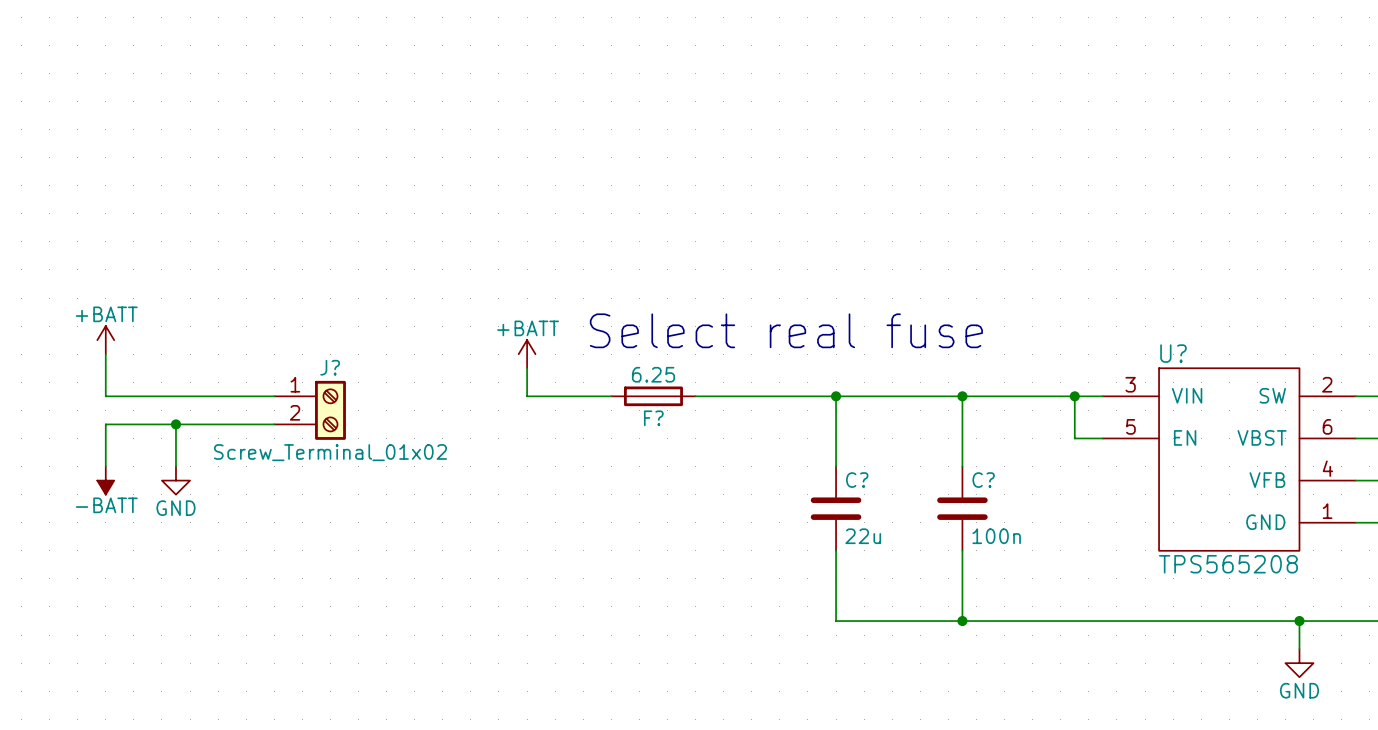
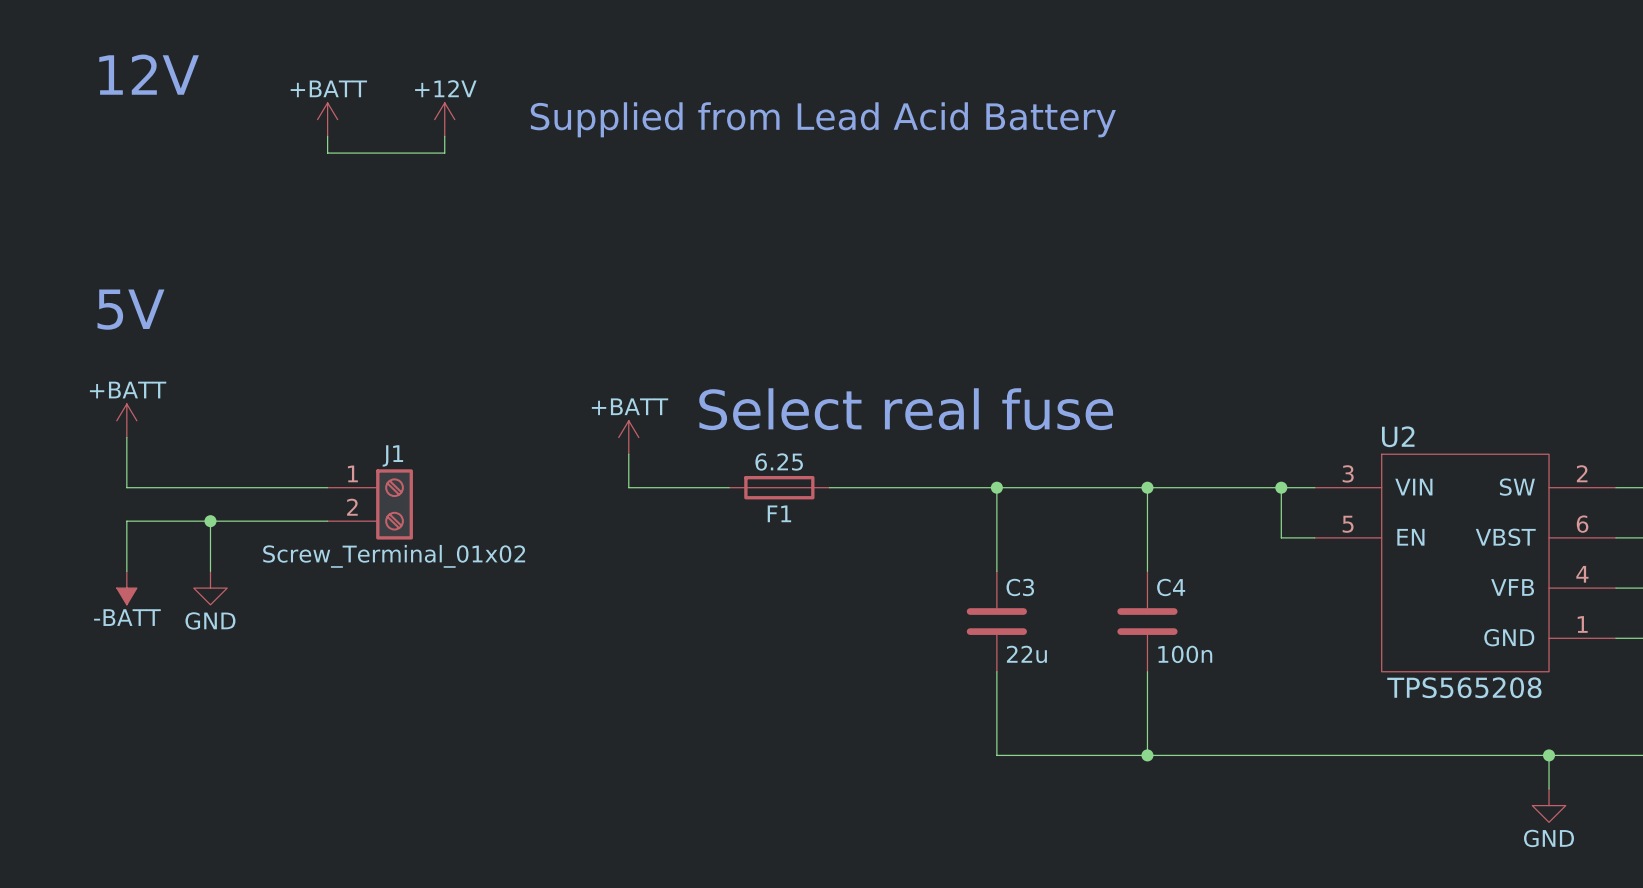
text: none -> 12V (149, 74)
power symbol: none -> +BATT (327, 119)
power symbol: none -> +12V (444, 119)
text: none -> Supplied from Lead Acid Battery (823, 119)
wire: none -> (327, 136) (327, 153) (444, 153) (444, 136)
text: none -> 5V (130, 309)
U? name: U? (1173, 353) -> U2 (1398, 436)
J? name: J? (330, 367) -> J1 (392, 455)
F? name: F? (653, 418) -> F1 (779, 513)
C? name: C? (857, 480) -> C3 (1020, 587)
C? name: C? (983, 480) -> C4 (1171, 587)

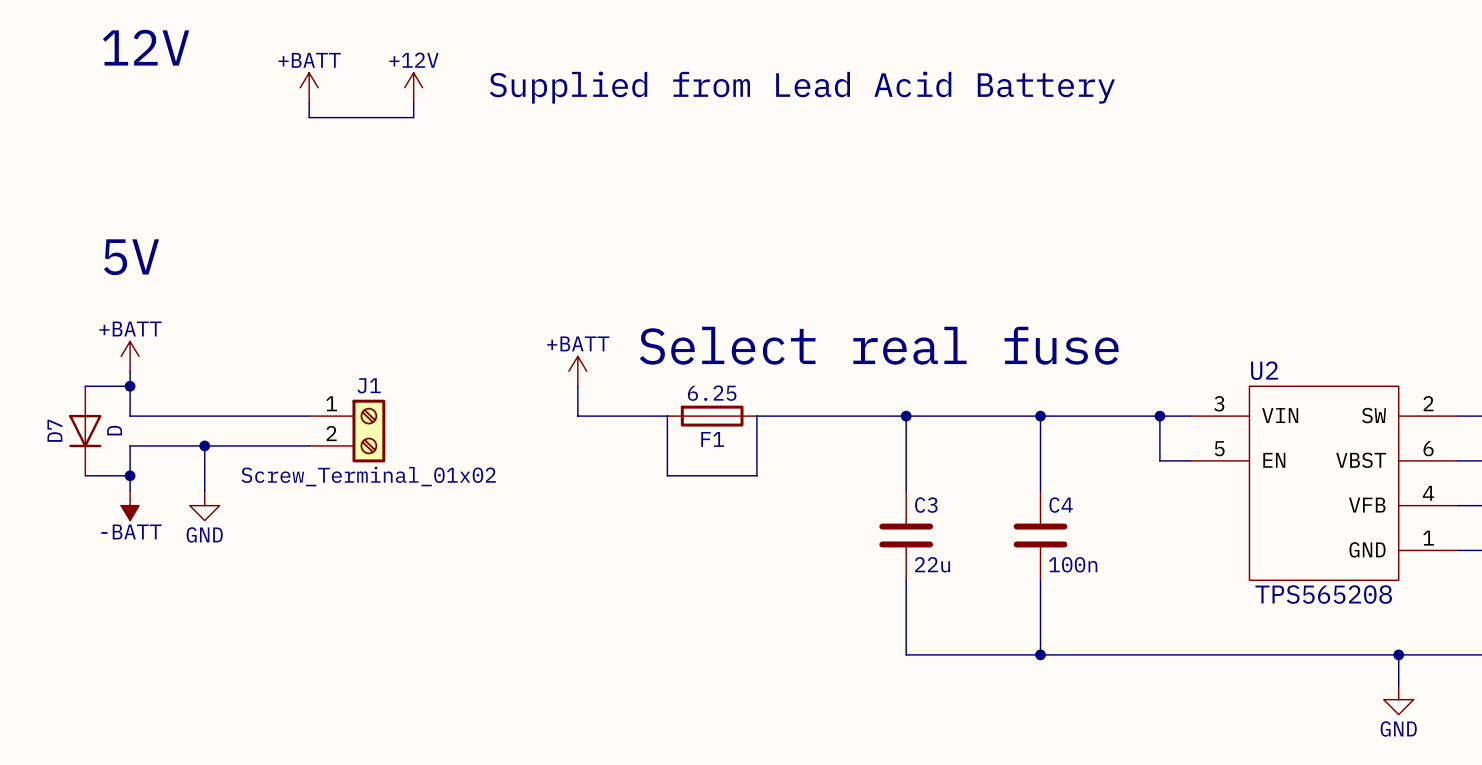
wire: none -> (85, 386) (130, 386)
junction: none -> (130, 386)
wire: none -> (667, 416) (667, 475) (756, 475) (756, 416)
D7: none -> D (85, 431)
wire: none -> (85, 475) (130, 475)
junction: none -> (130, 475)

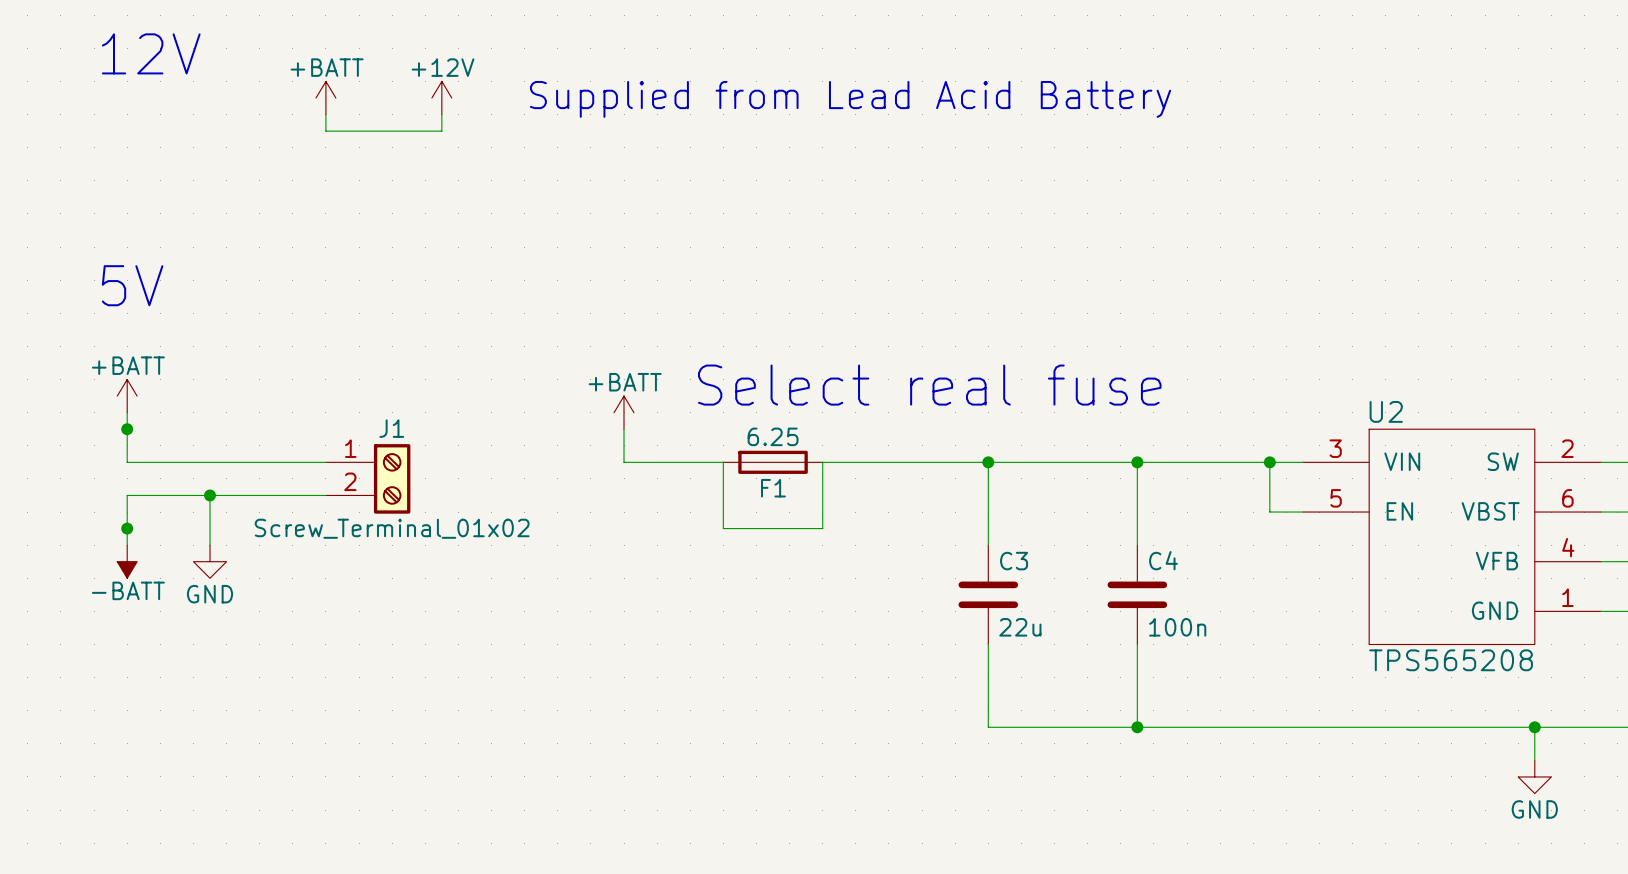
wire: (85, 386) (130, 386) -> none
D7: D (85, 431) -> none
wire: (85, 475) (130, 475) -> none

